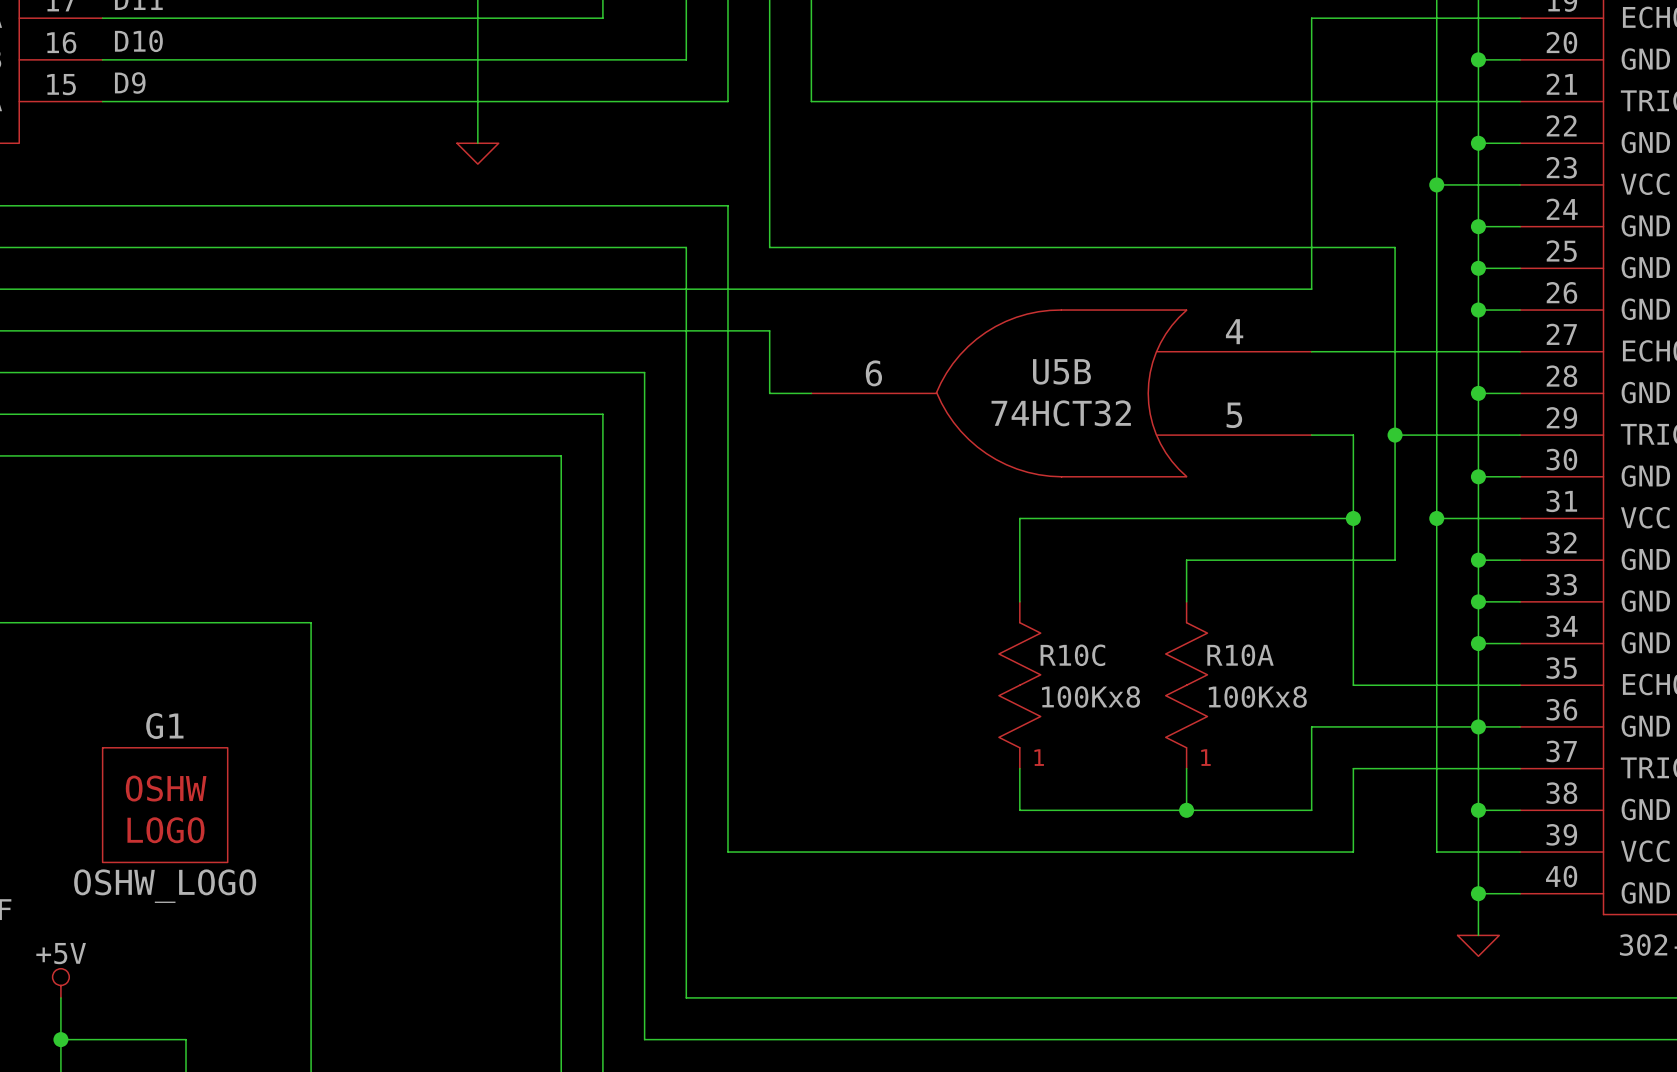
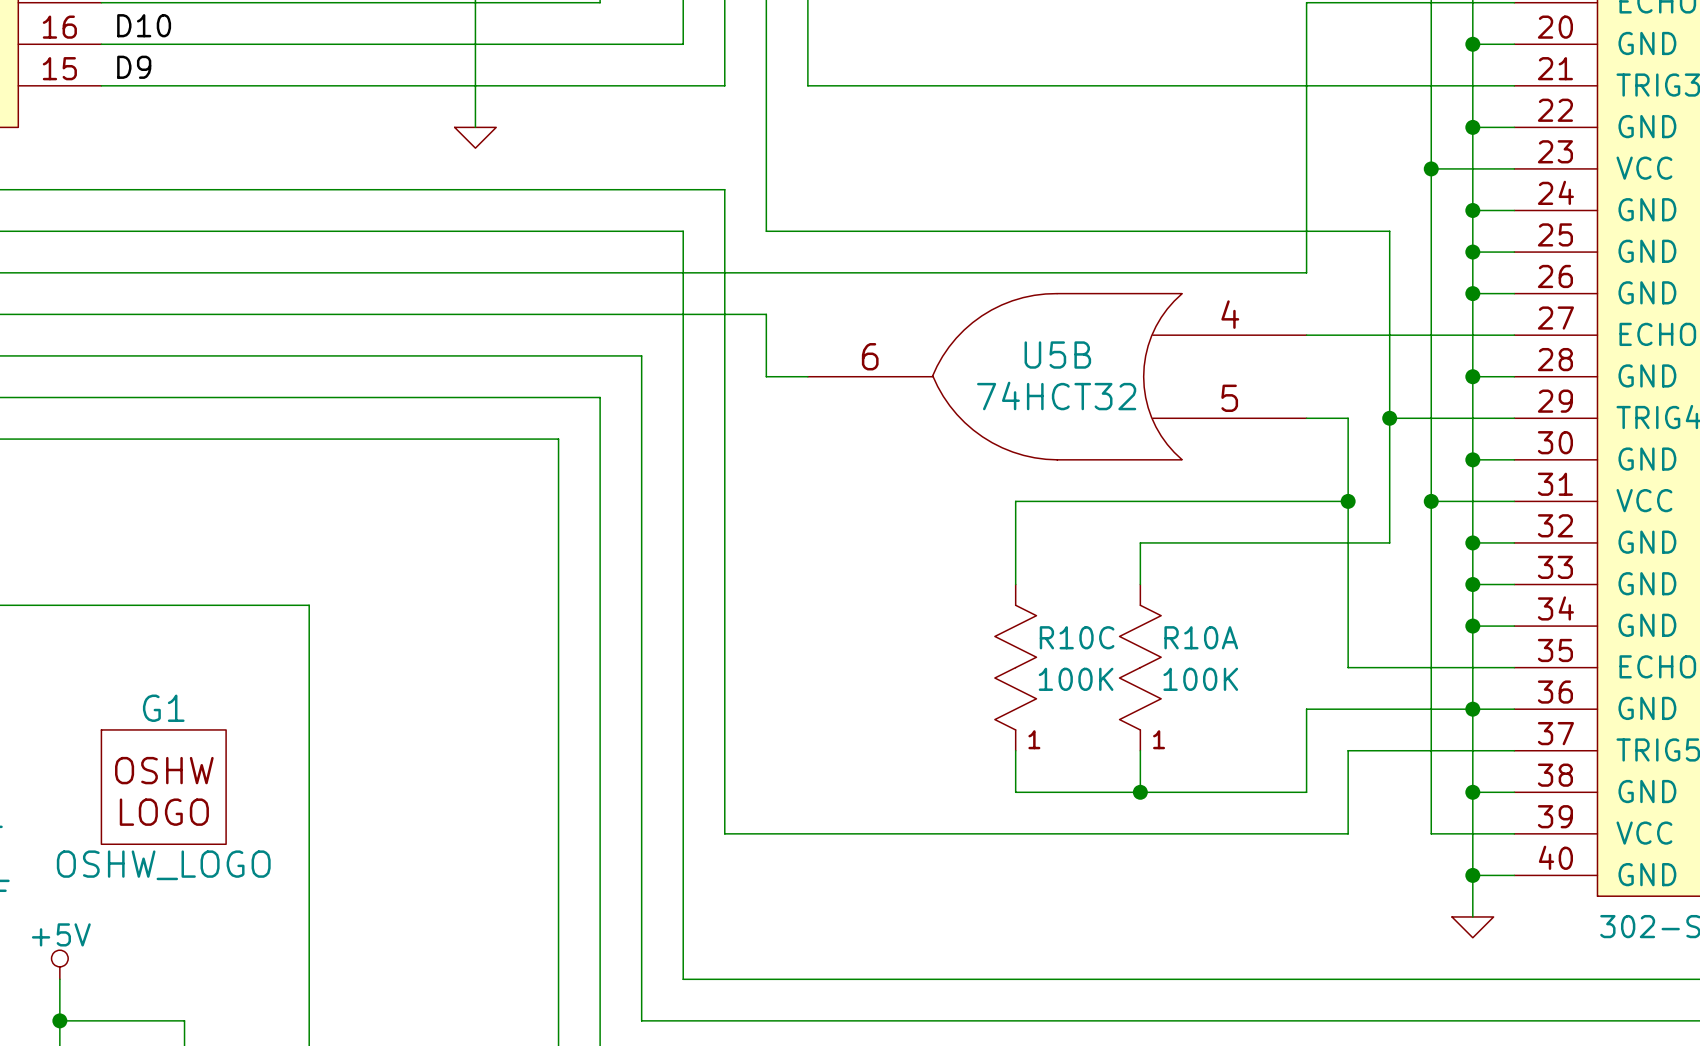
wire: (1186, 560) (1186, 601) -> (1181, 542) (1140, 542) (1140, 584)
R10A position: (1186, 685) -> (1140, 667)
R10C value: 100Kx8 (1091, 696) -> 100K (1076, 679)
R10A value: 100Kx8 (1257, 696) -> 100K (1200, 679)
wire: (1186, 768) (1186, 810) -> (1140, 750) (1140, 792)
junction position: (1186, 810) -> (1140, 792)

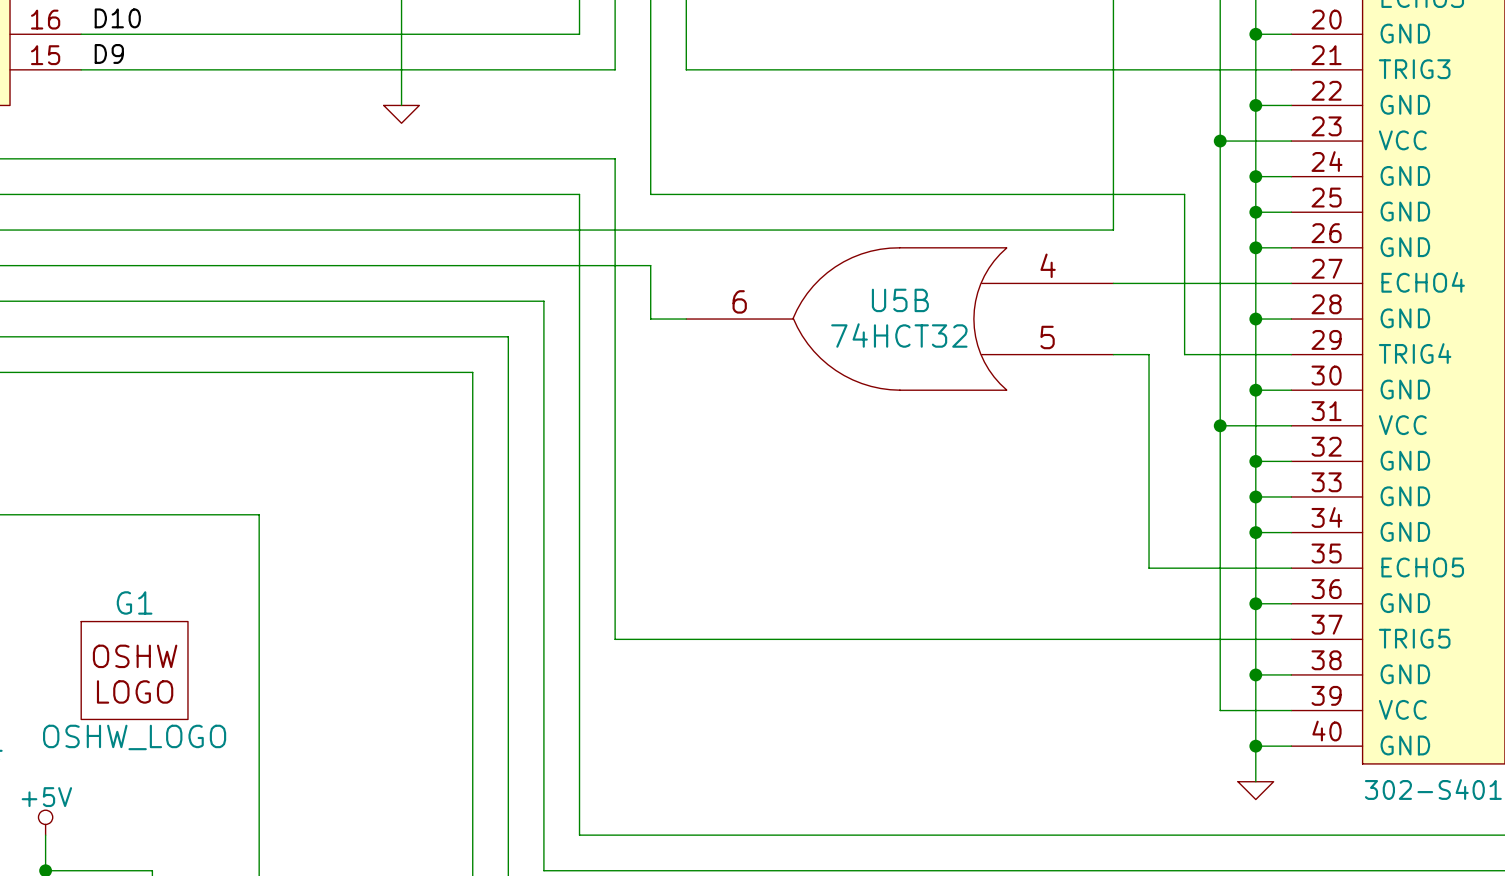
wire: (1389, 418) (1389, 542) (1140, 542) (1140, 584) -> none
junction: (1389, 418) -> none
wire: (1348, 501) (1015, 501) (1015, 584) -> none
junction: (1348, 501) -> none
R10C: 100K (1015, 667) -> none
R10A: 100K (1140, 667) -> none
wire: (1472, 709) (1306, 709) (1306, 792) (1015, 792) (1015, 750) -> none
wire: (724, 750) (724, 833) (1348, 833) (1348, 750) -> (615, 639) (1149, 639)
wire: (1140, 750) (1140, 792) -> none
junction: (1140, 792) -> none

